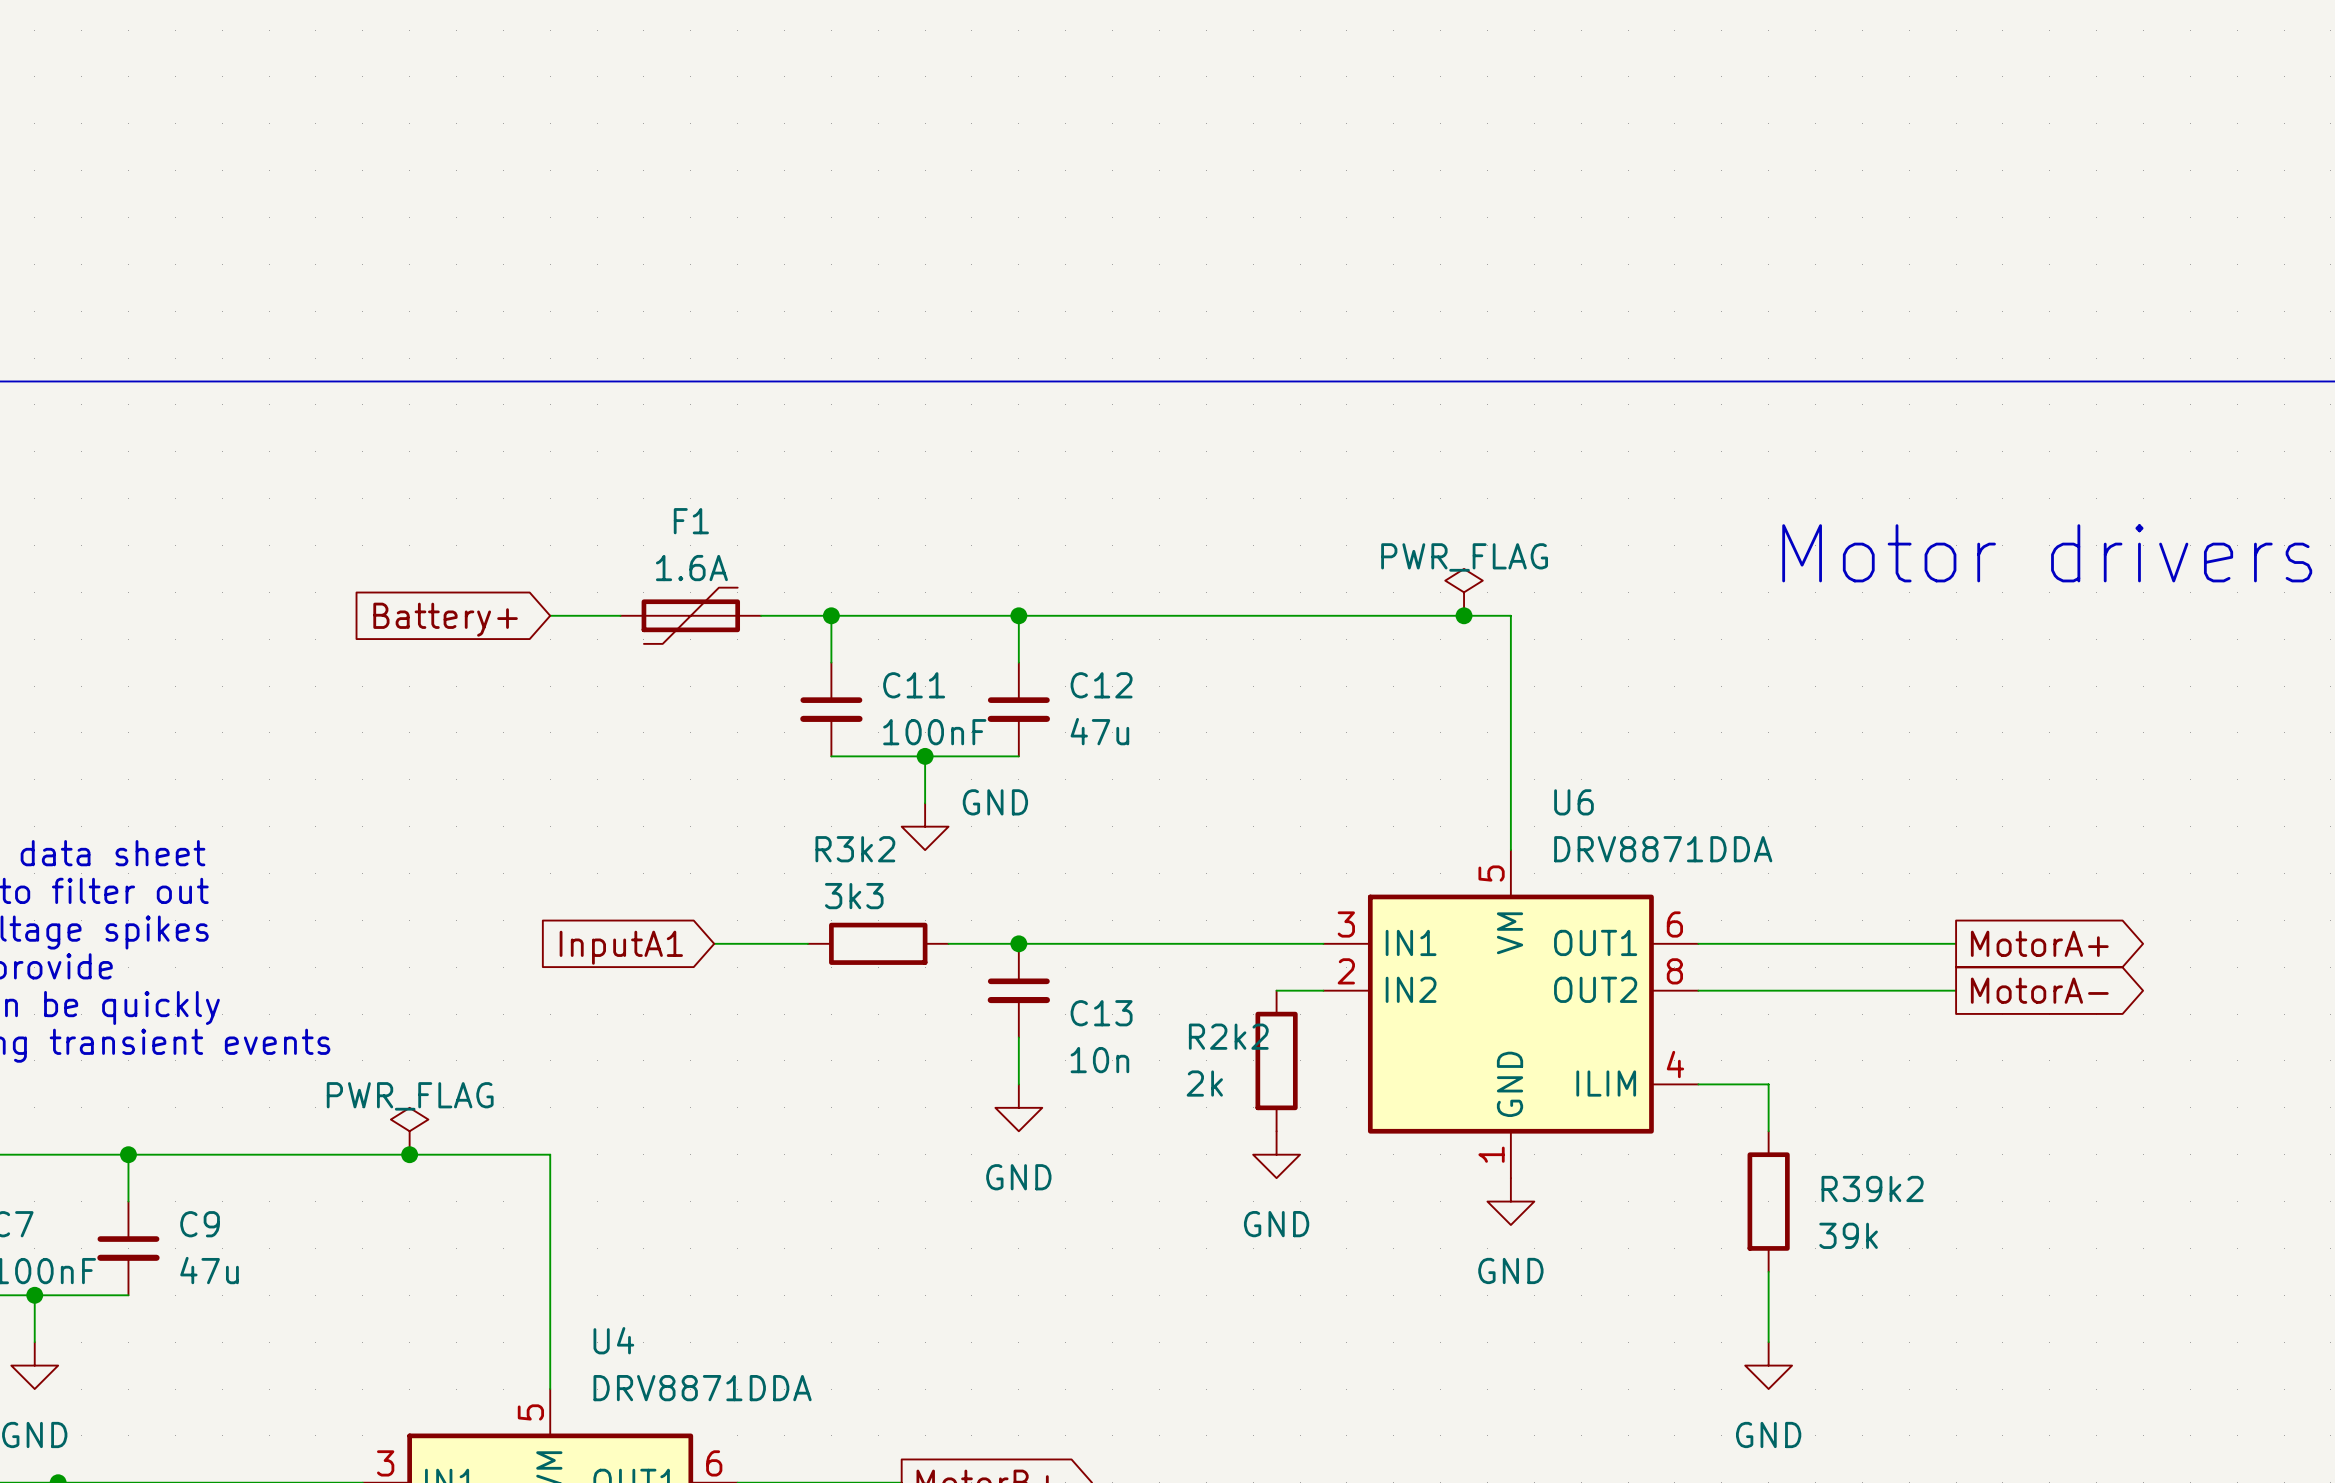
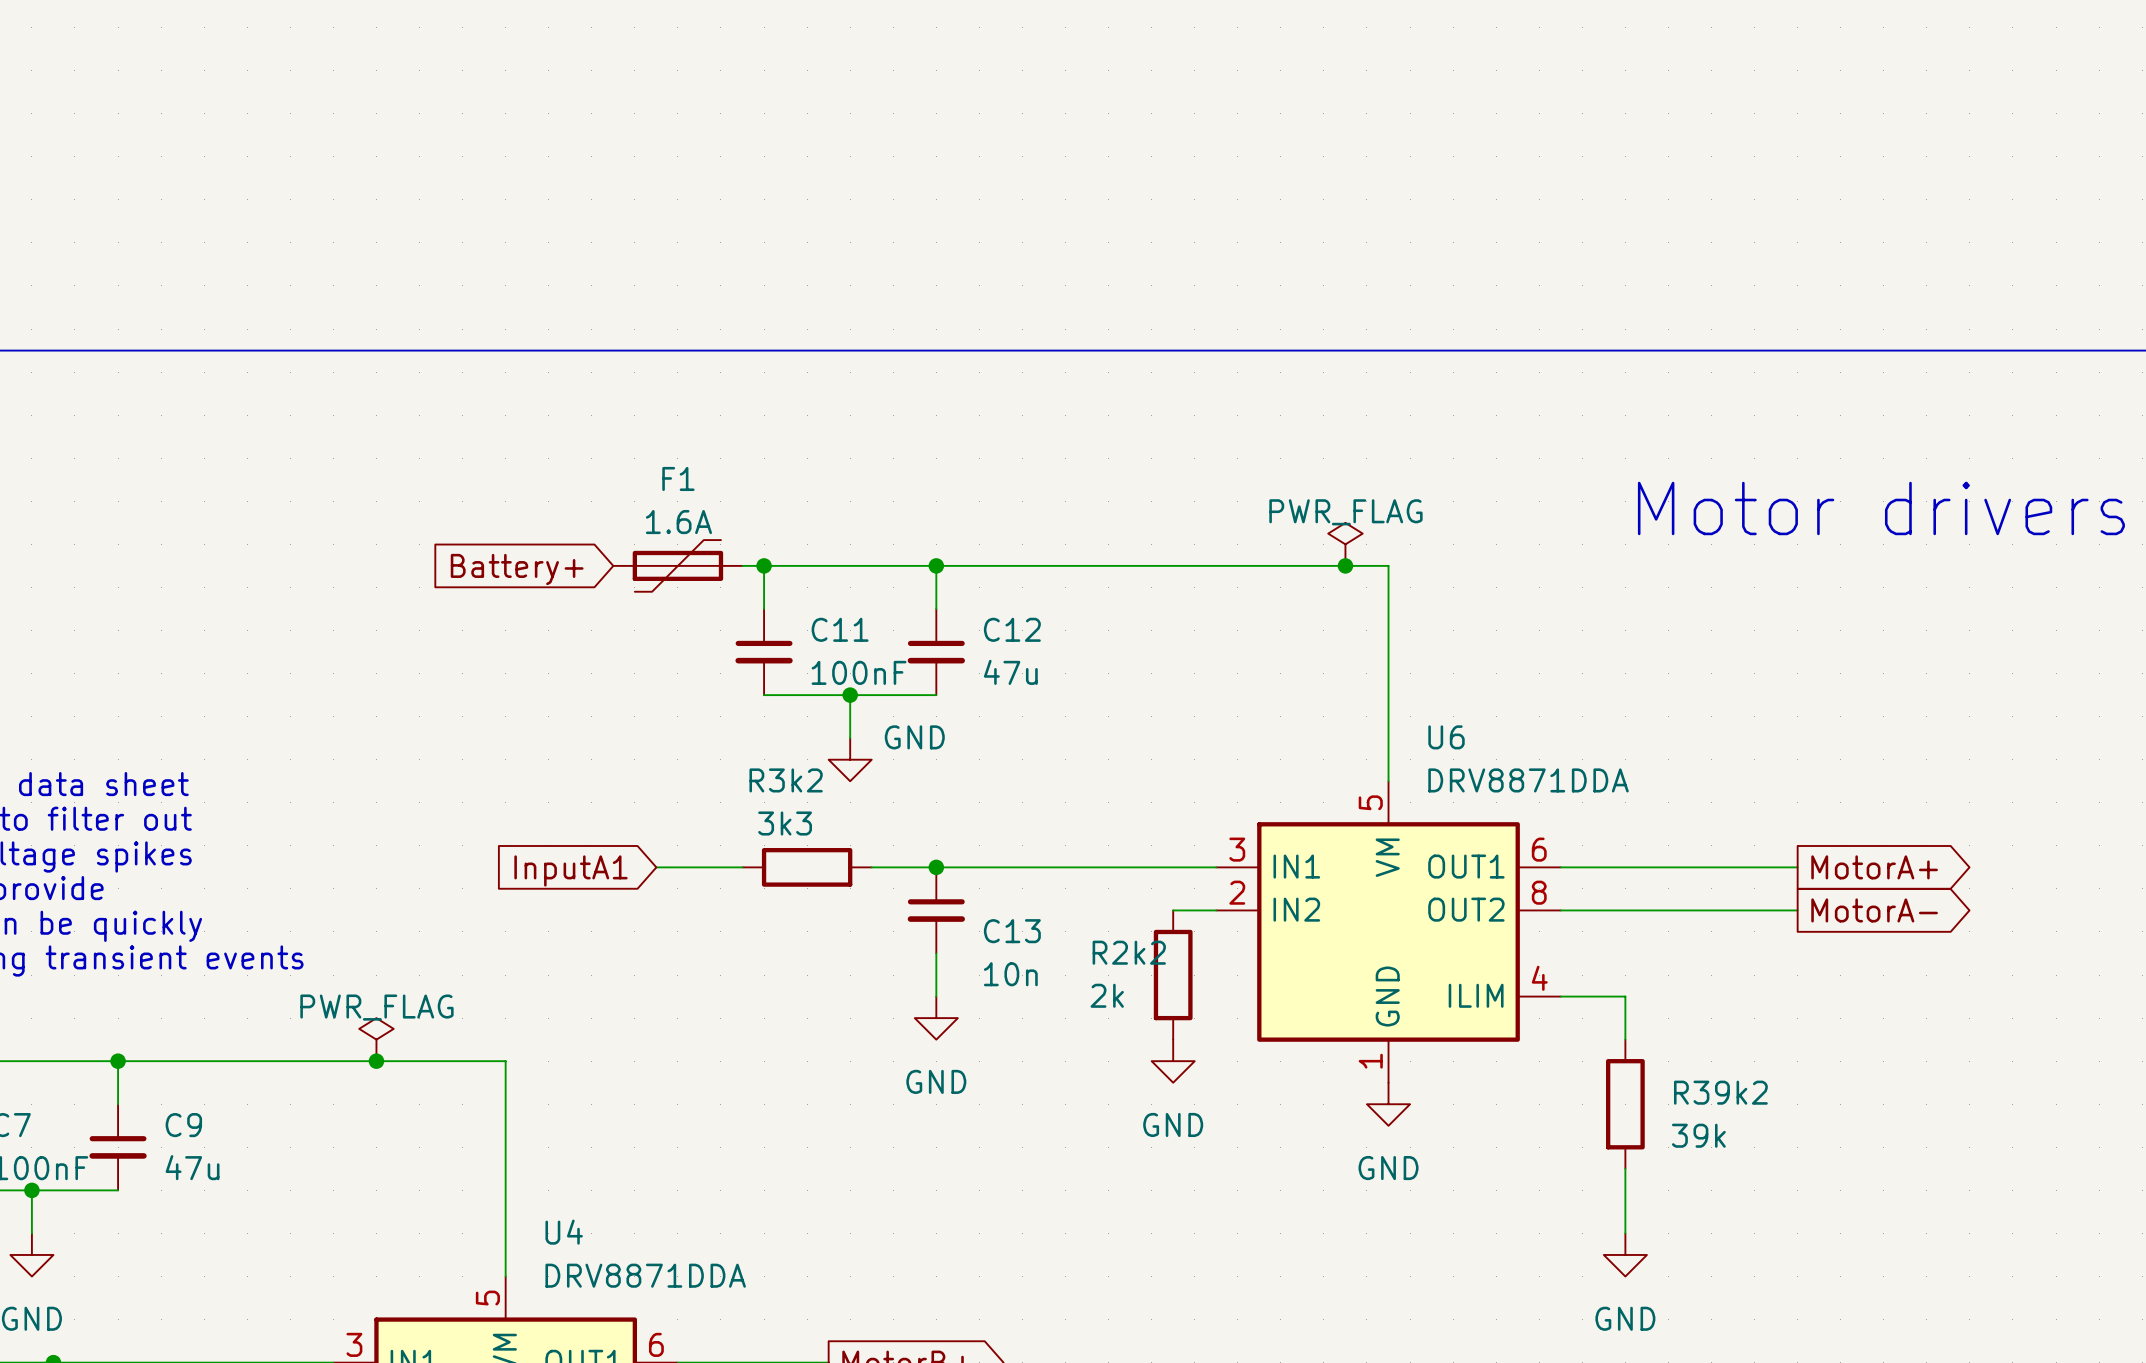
wire: (550, 615) (620, 615) -> none
F1 position: (690, 615) -> (677, 565)
global label position: Battery+ (445, 619) -> Battery+ (517, 569)

